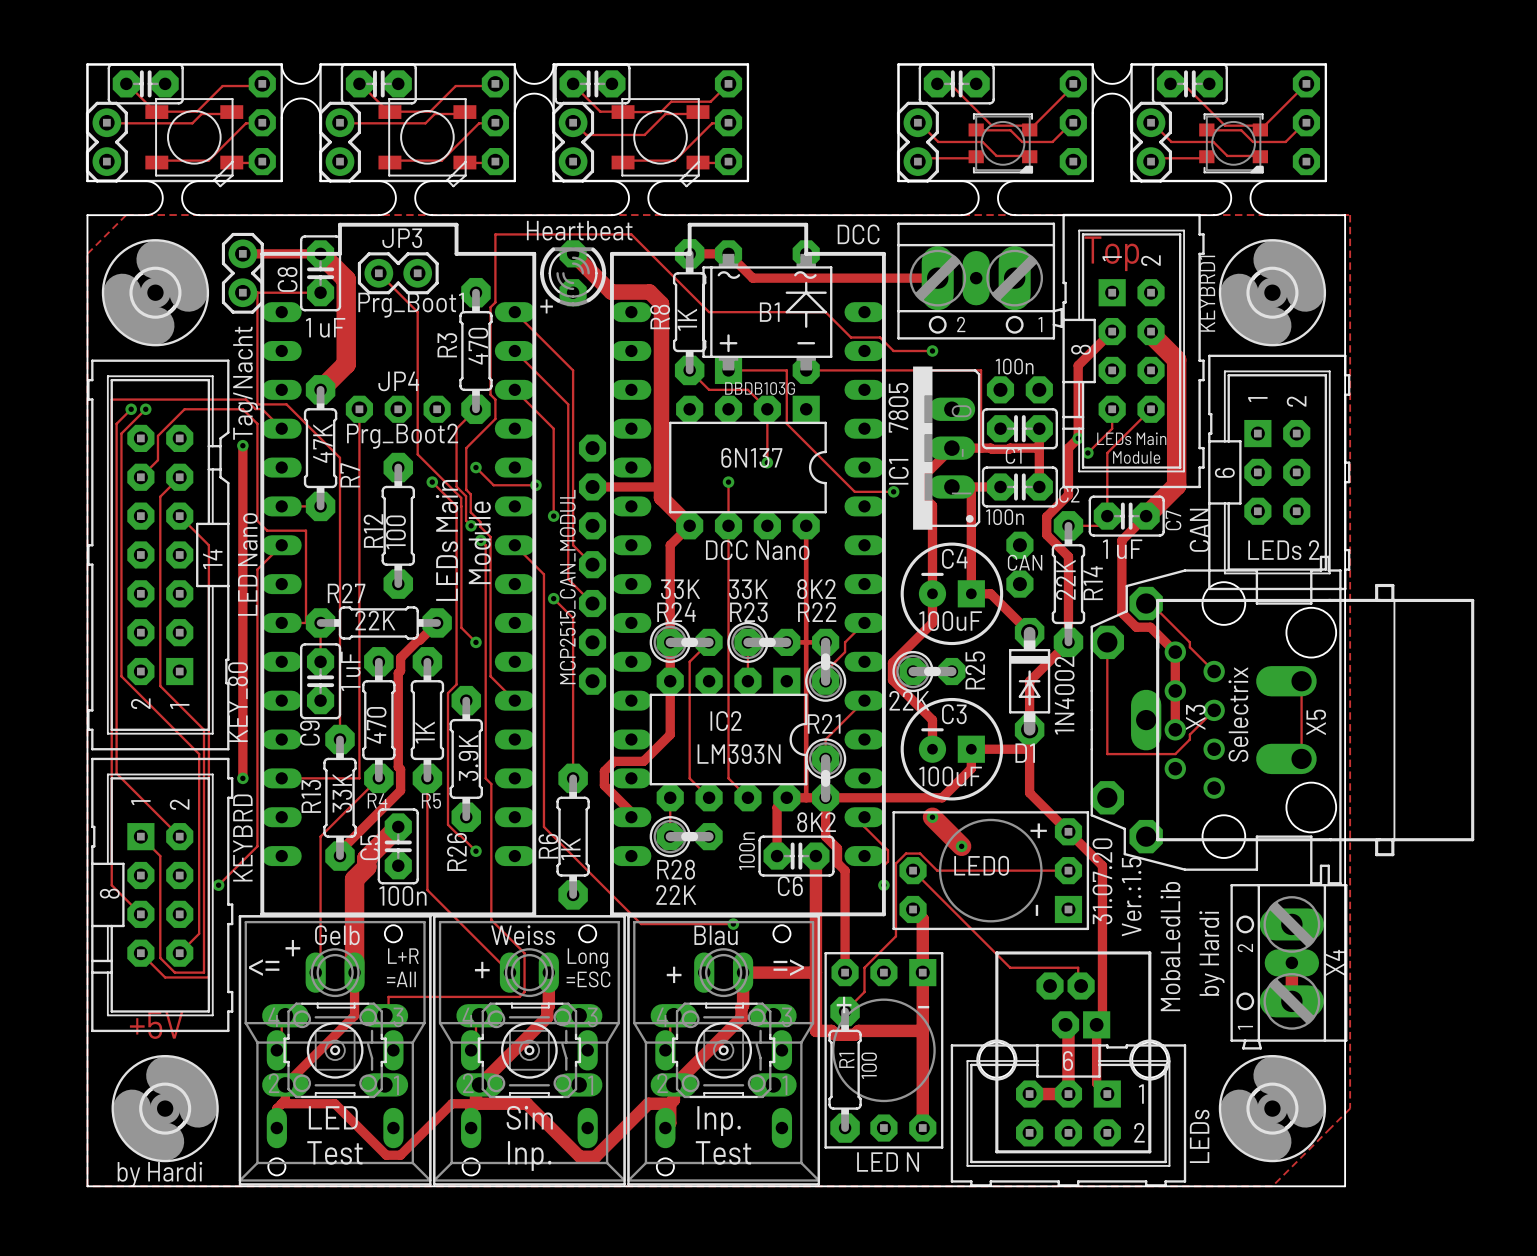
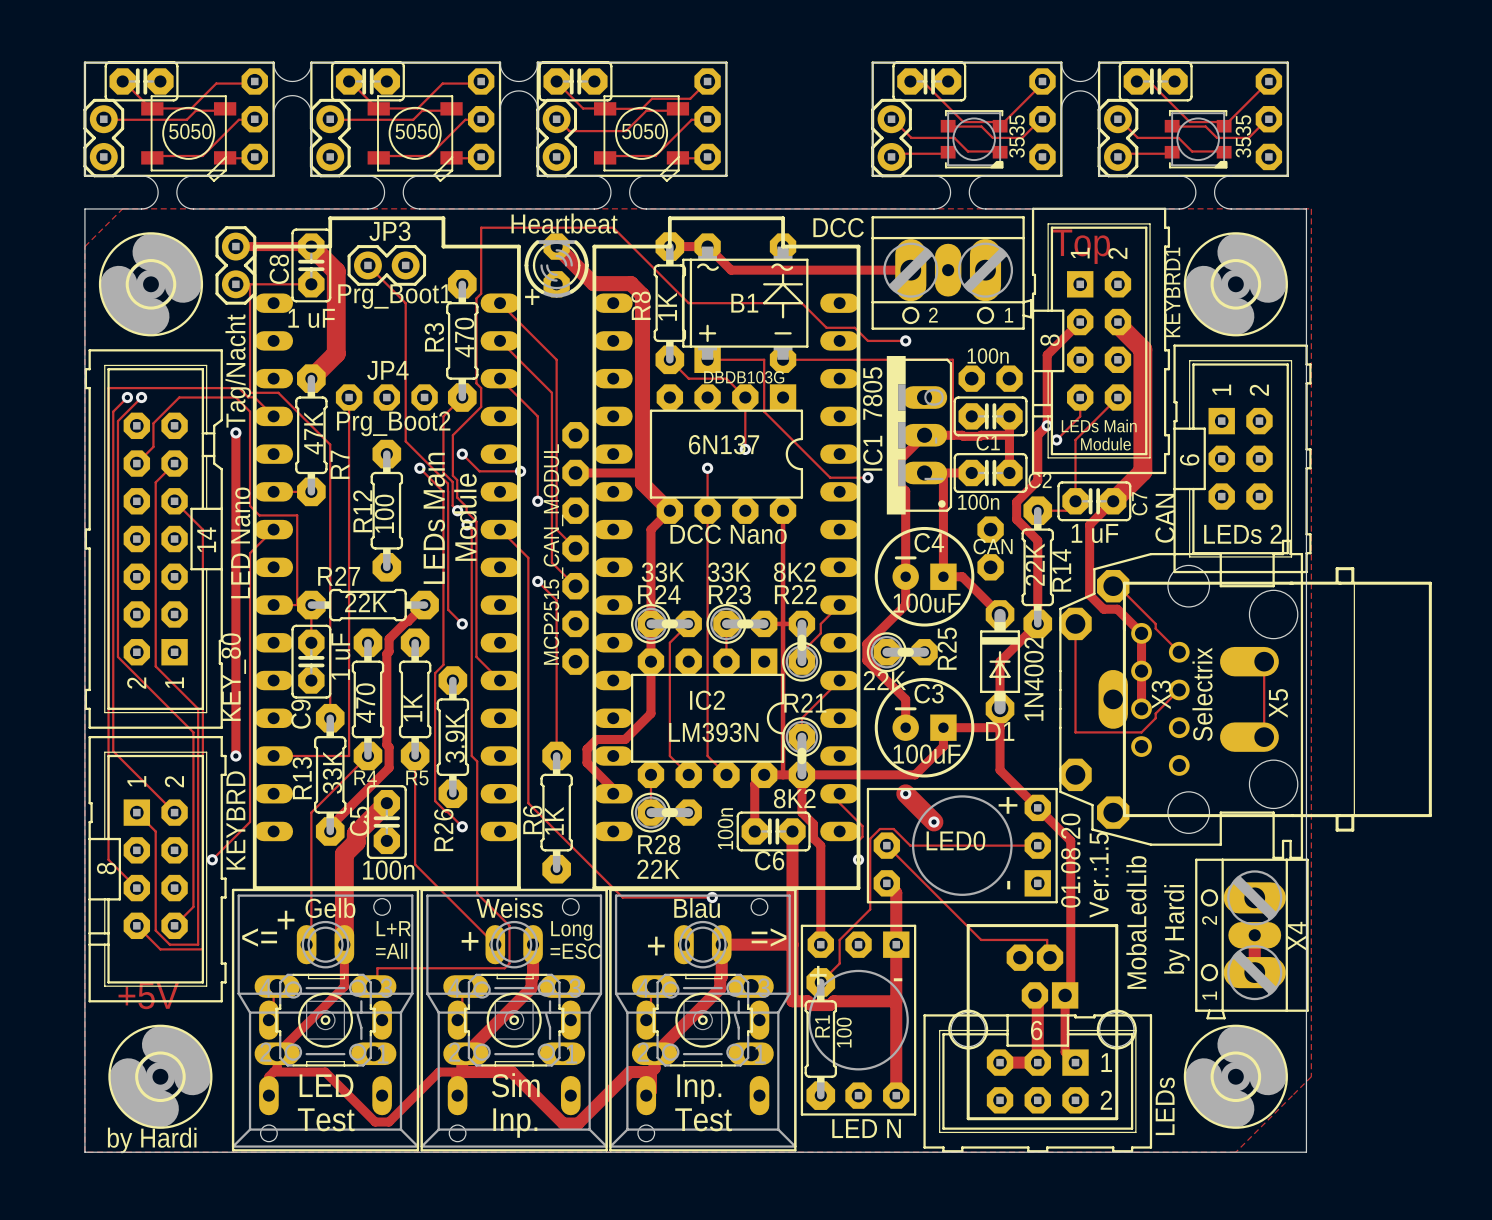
text: none -> 5050 (190, 131)
text: none -> 5050 (416, 131)
text: none -> 5050 (643, 131)
text: none -> 3535 (1017, 136)
text: none -> 3535 (1243, 136)
text: 31.07.20 (1102, 881) -> 01.08.20 (1070, 860)

